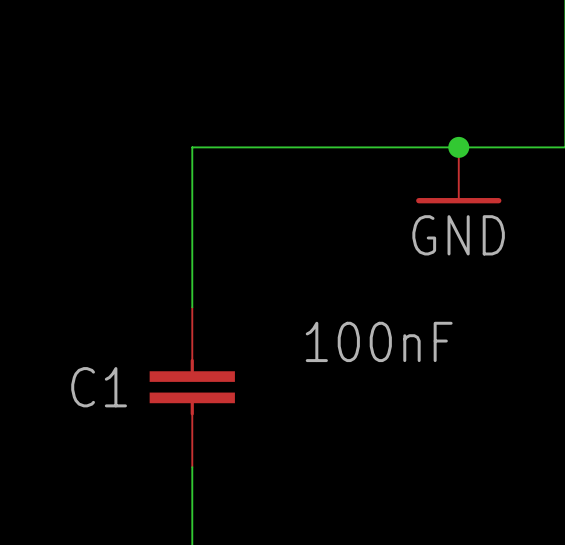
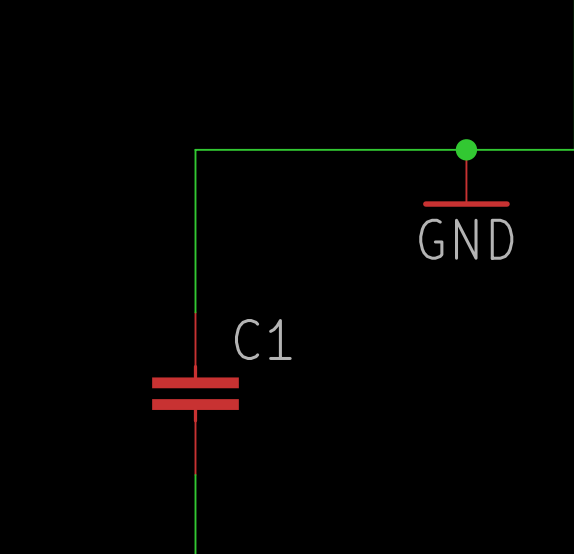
C1 text: 100nF (379, 341) -> none
C1 name position: C1 (99, 387) -> C1 (263, 339)

